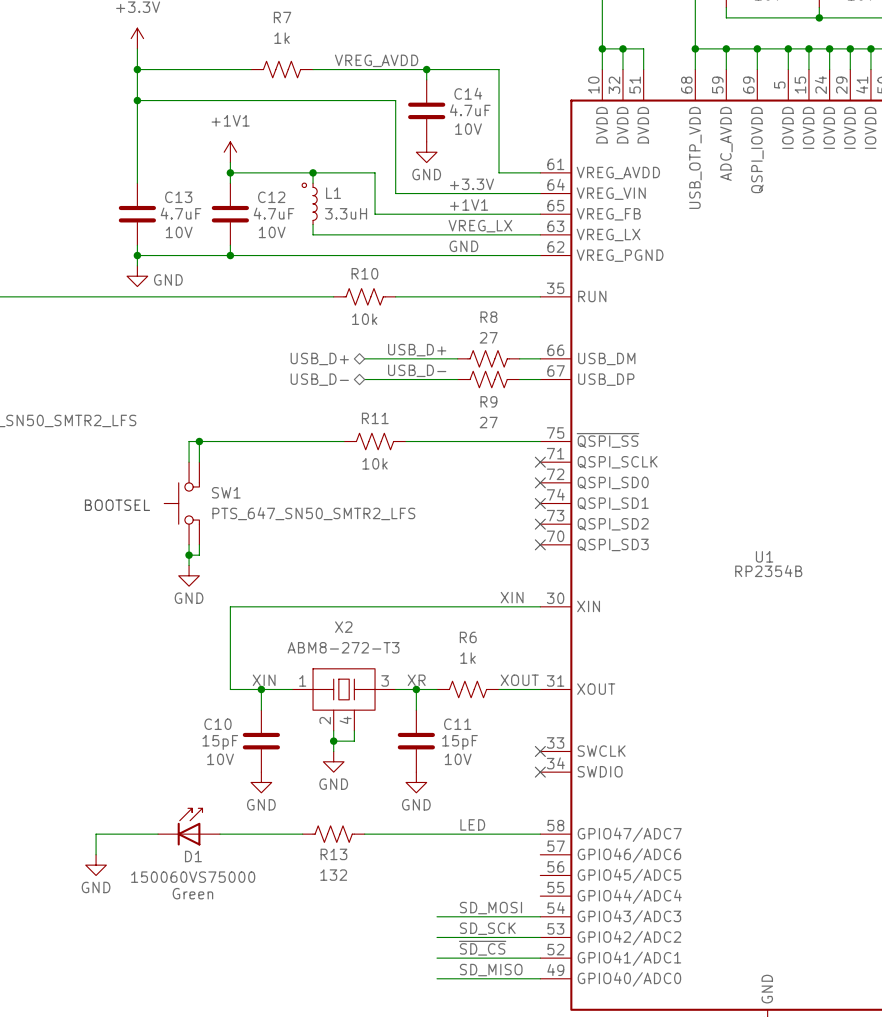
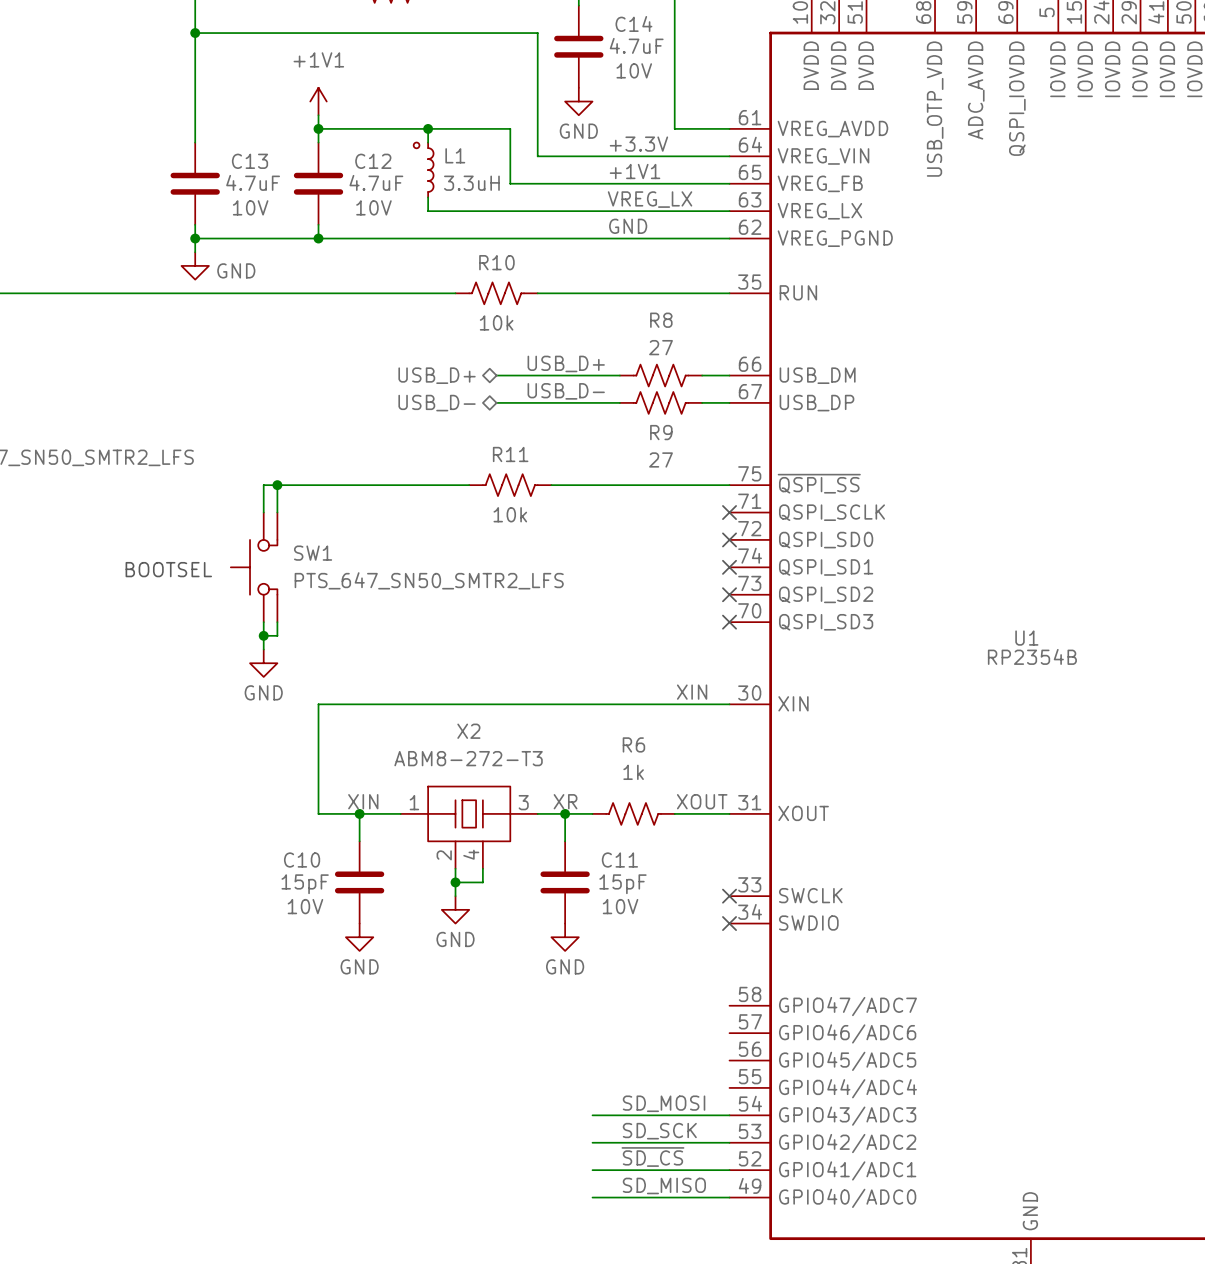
label: LED (472, 824) -> none
D1: 150060VS75000 (189, 826) -> none
wire: (158, 834) (96, 834) (96, 854) -> none
wire: (220, 834) (302, 834) -> none
R13: 132 (333, 834) -> none
wire: (364, 834) (540, 834) -> none
power symbol: GND (96, 865) -> none

